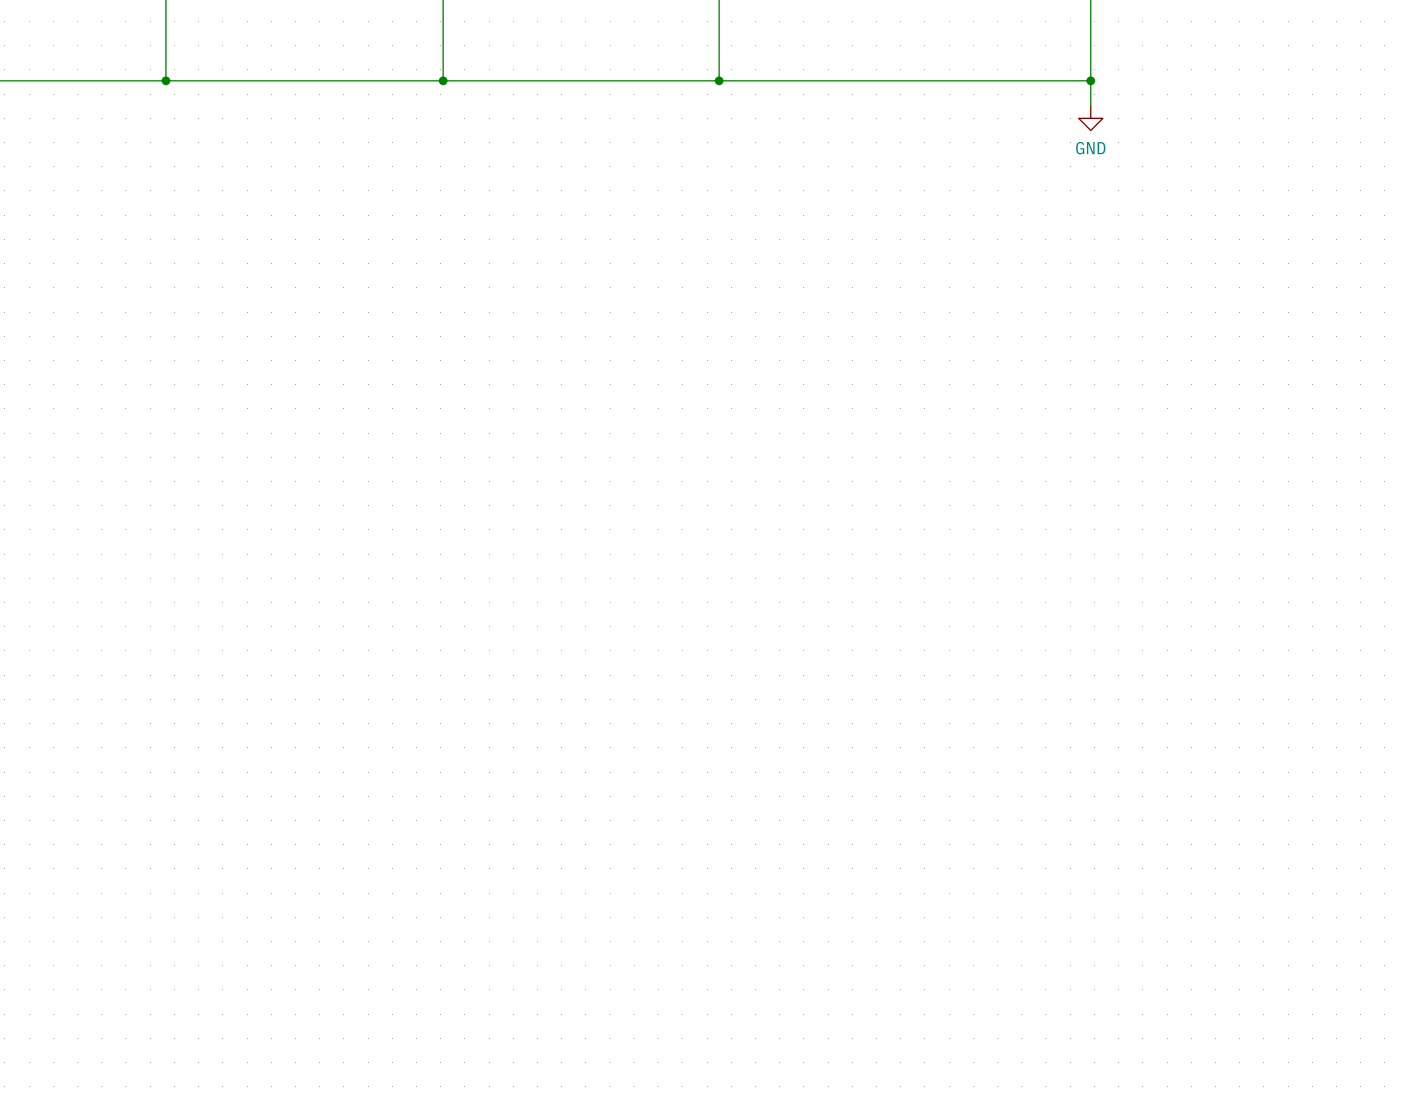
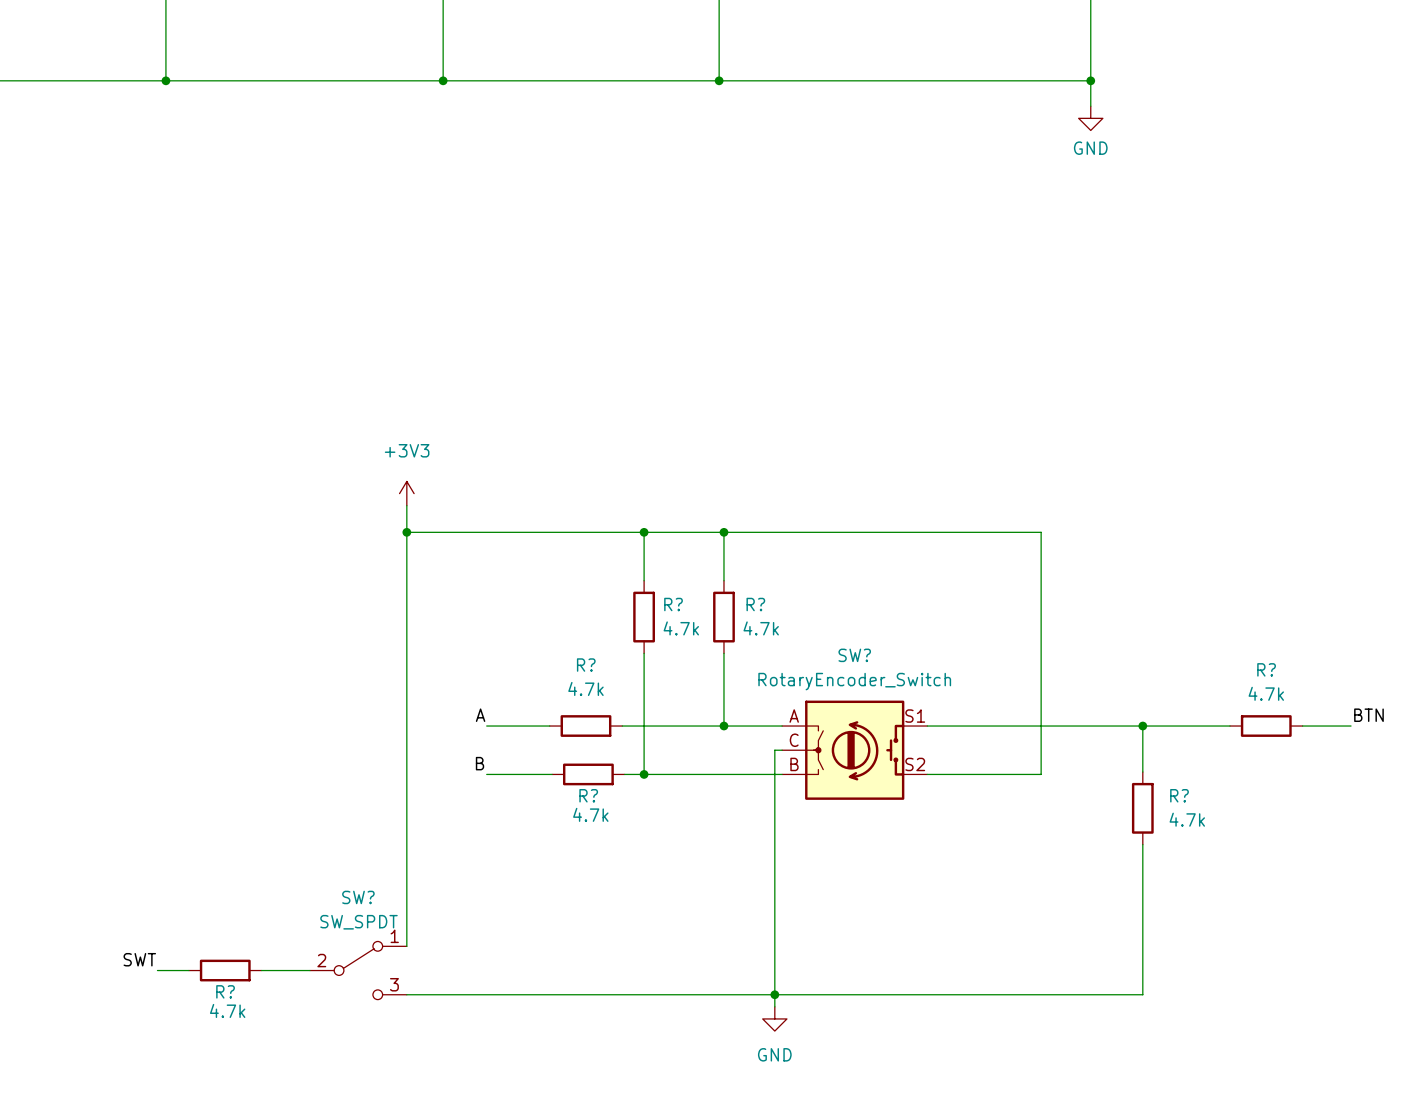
power symbol: none -> +3V3 (406, 493)
wire: none -> (406, 505) (406, 946)
wire: none -> (406, 532) (1041, 532) (1041, 774) (927, 774)
junction: none -> (406, 532)
wire: none -> (644, 532) (644, 580)
junction: none -> (644, 532)
wire: none -> (723, 532) (723, 580)
junction: none -> (723, 532)
R?: none -> 4.7k (644, 617)
R?: none -> 4.7k (723, 617)
wire: none -> (644, 653) (644, 774)
wire: none -> (723, 653) (723, 726)
label: none -> A (480, 715)
label: none -> BTN (1368, 715)
wire: none -> (486, 726) (549, 726)
R?: none -> 4.7k (585, 726)
wire: none -> (622, 726) (782, 726)
junction: none -> (723, 726)
wire: none -> (927, 726) (1229, 726)
wire: none -> (1142, 726) (1142, 772)
junction: none -> (1142, 726)
R?: none -> 4.7k (1266, 726)
wire: none -> (1302, 726) (1351, 726)
wire: none -> (782, 750) (774, 750) (774, 1006)
SW?: none -> RotaryEncoder_Switch (854, 750)
label: none -> B (480, 763)
wire: none -> (486, 774) (552, 774)
R?: none -> 4.7k (588, 774)
wire: none -> (624, 774) (782, 774)
junction: none -> (644, 774)
R?: none -> 4.7k (1142, 808)
wire: none -> (1142, 844) (1142, 994) (406, 994)
label: none -> SWT (139, 959)
wire: none -> (157, 970) (188, 970)
R?: none -> 4.7k (225, 970)
wire: none -> (261, 970) (309, 970)
SW?: none -> SW_SPDT (358, 970)
junction: none -> (774, 994)
power symbol: none -> GND (774, 1018)

